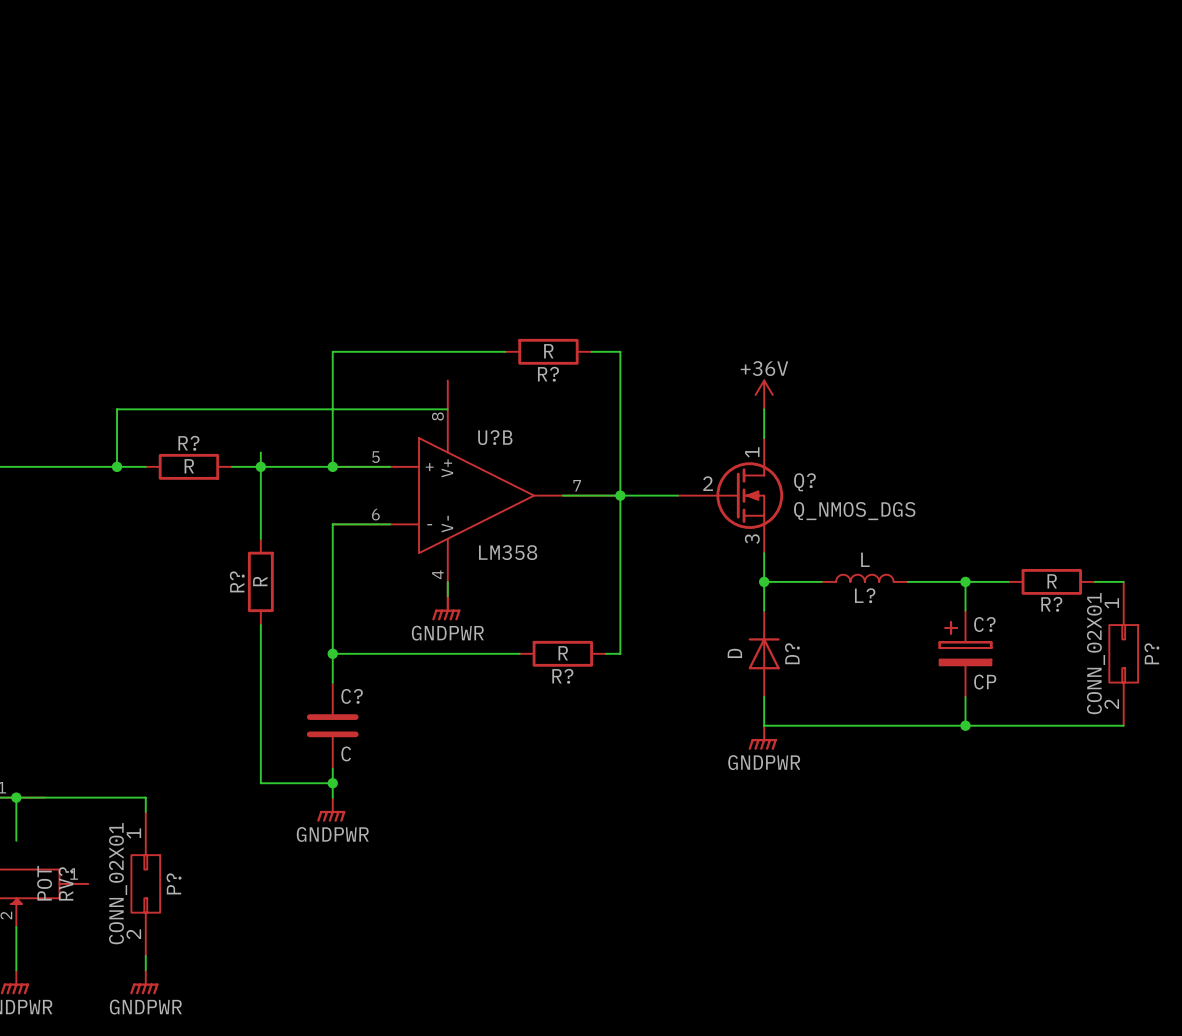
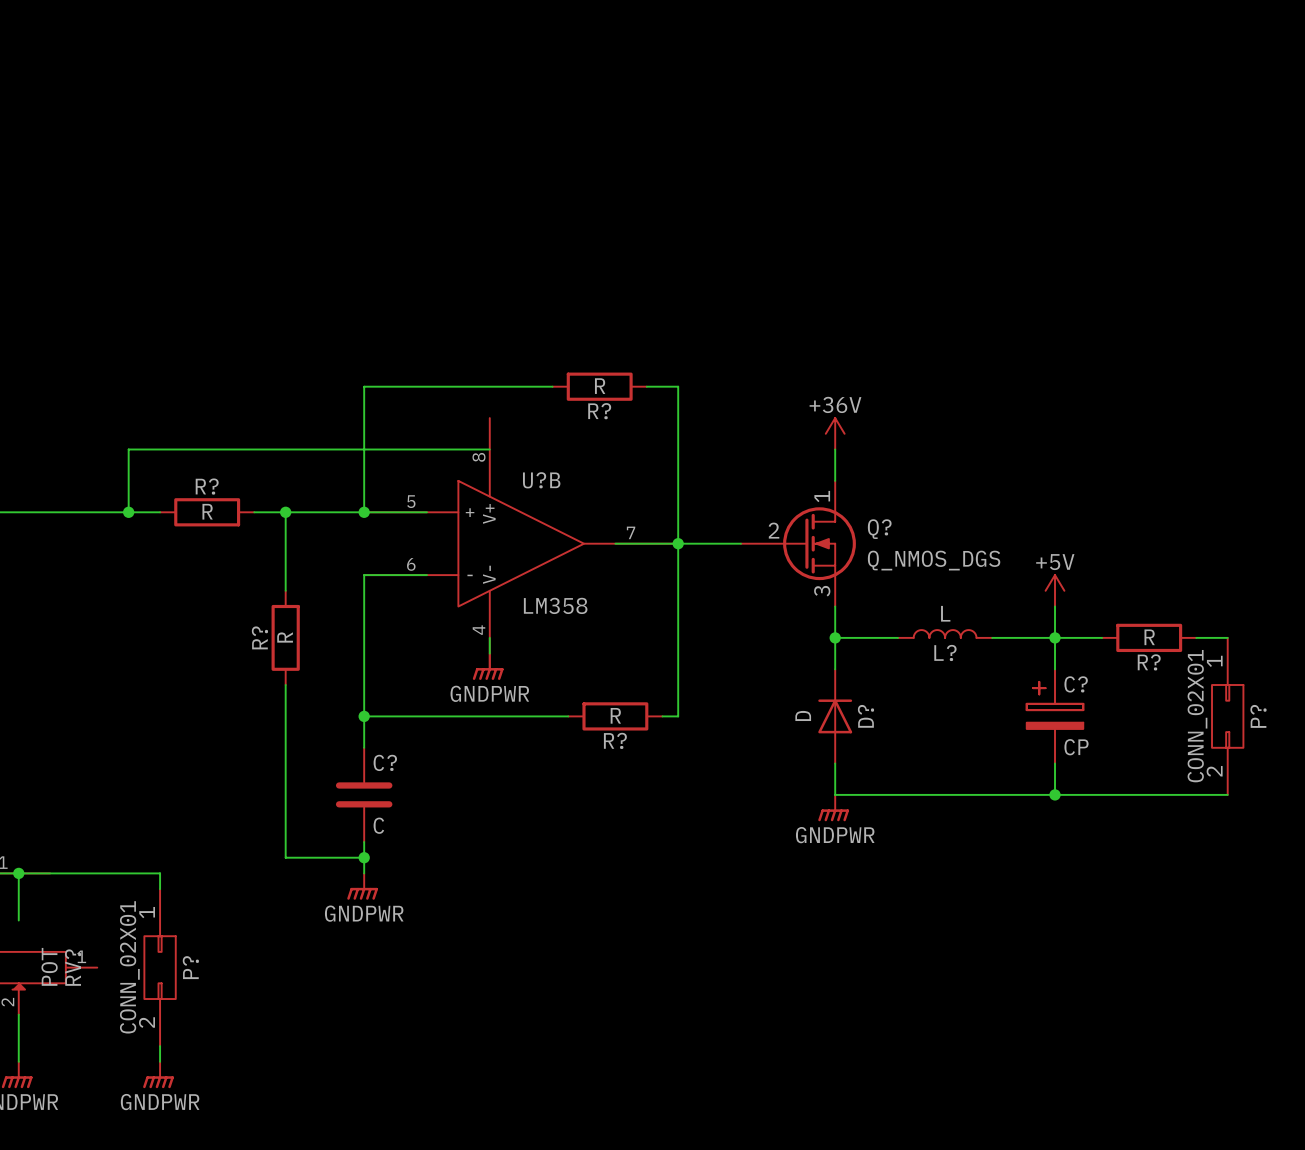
wire: (260, 452) (260, 466) -> none
power symbol: none -> +5V (1055, 590)
wire: none -> (1055, 606) (1055, 637)

